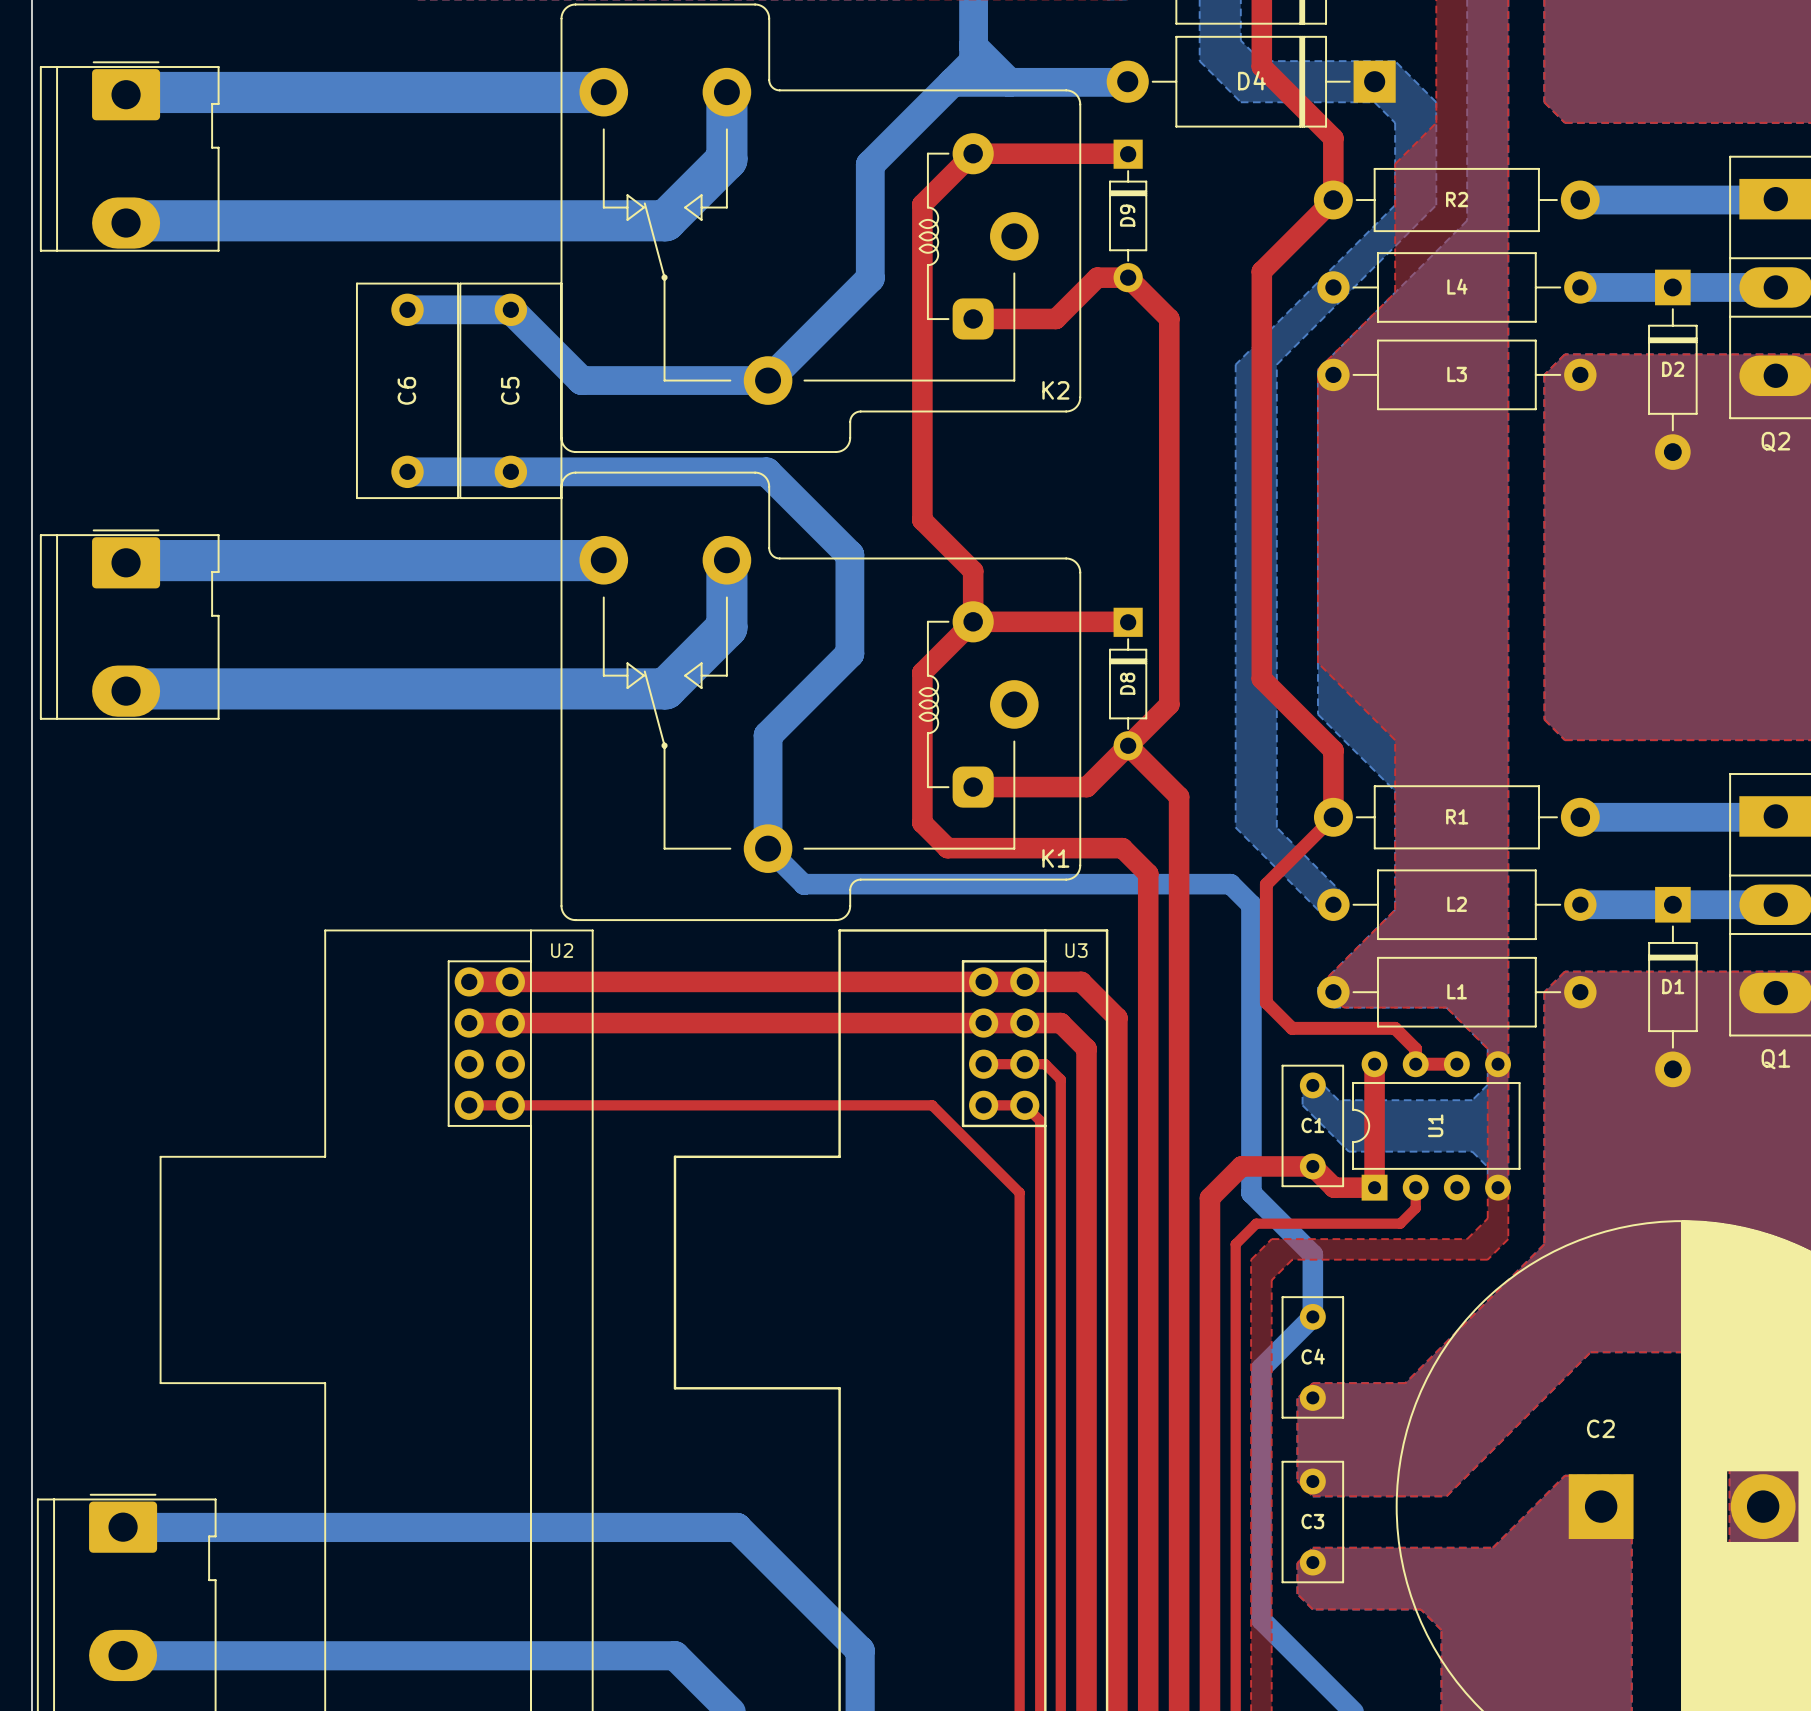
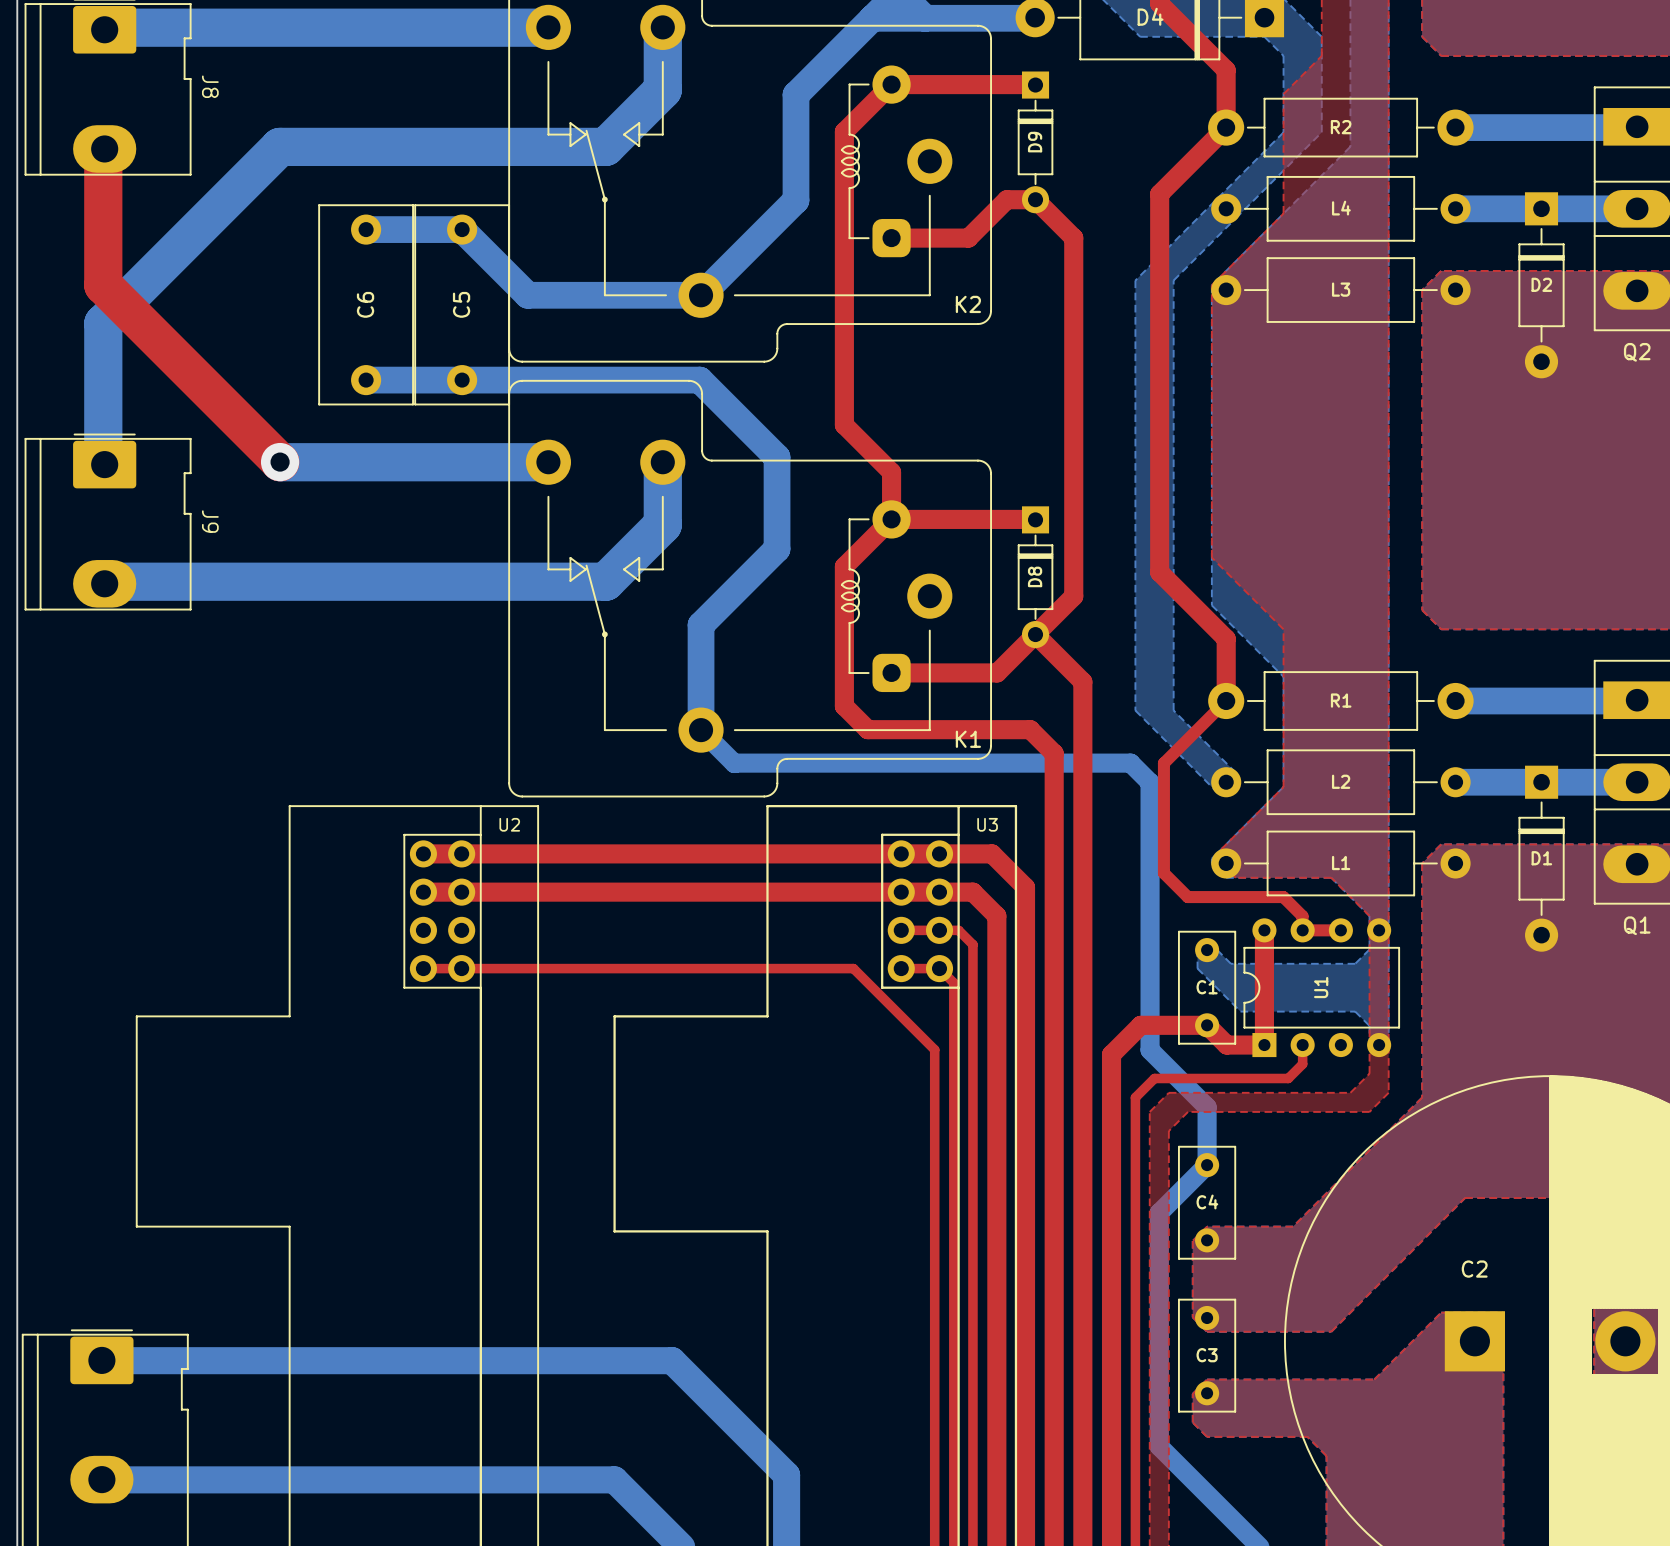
J8 name: none -> J8 (210, 86)
top track: none -> (103, 146) (103, 285) (280, 462)
bottom track: (314, 220) (128, 220) (126, 223) -> (279, 146) (103, 323) (103, 462)
via: none -> (280, 462)
bottom track: (603, 560) (128, 560) (126, 562) -> (548, 462) (280, 462)
J9 name: none -> J9 (210, 521)

